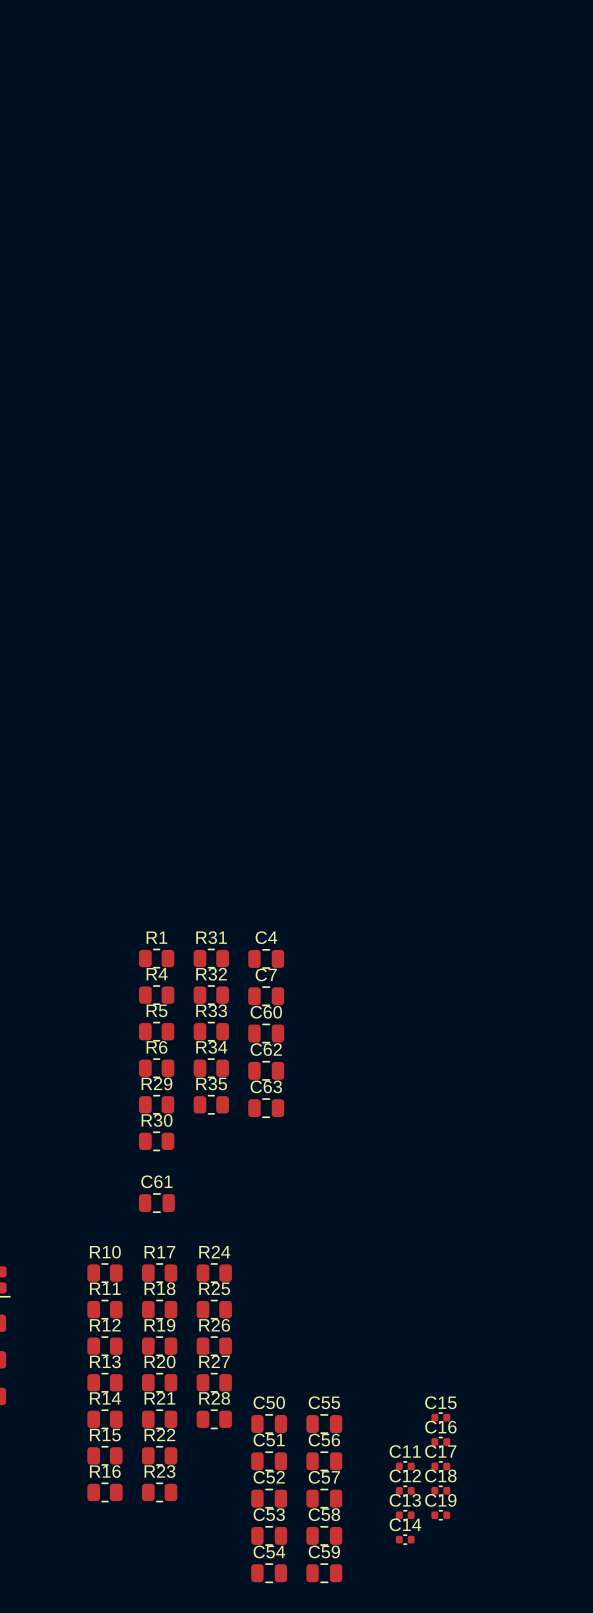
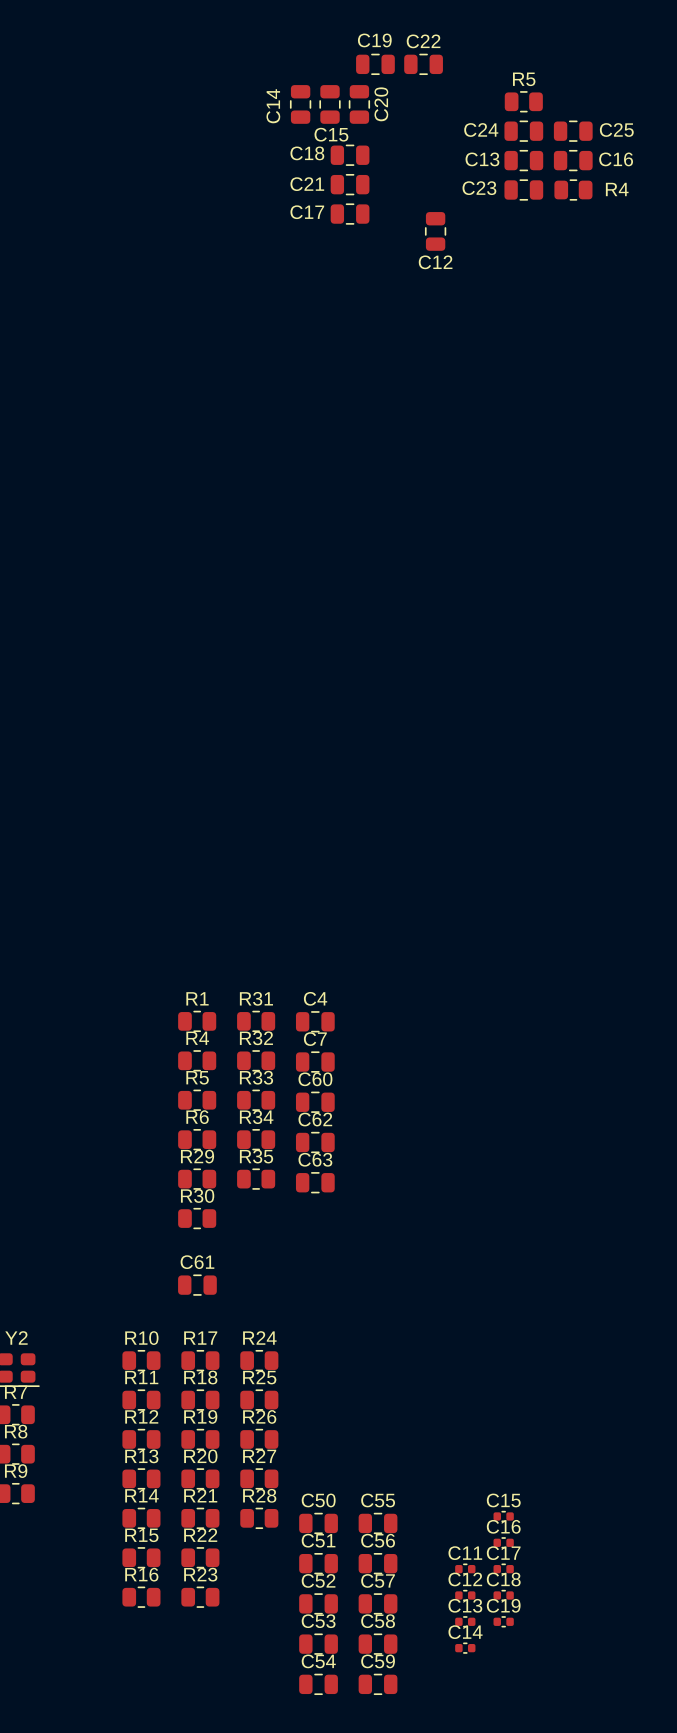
C19: none -> (375, 64)
C22: none -> (423, 64)
R5: none -> (523, 101)
C14: none -> (300, 104)
C15: none -> (330, 104)
C20: none -> (359, 104)
C24: none -> (523, 131)
C25: none -> (573, 131)
C18: none -> (350, 155)
C13: none -> (523, 160)
C16: none -> (573, 160)
C21: none -> (350, 184)
C23: none -> (523, 189)
R4: none -> (573, 189)
C17: none -> (350, 214)
C12: none -> (435, 231)

